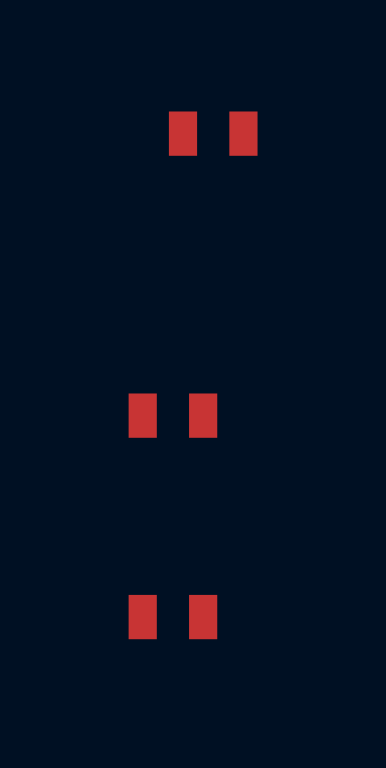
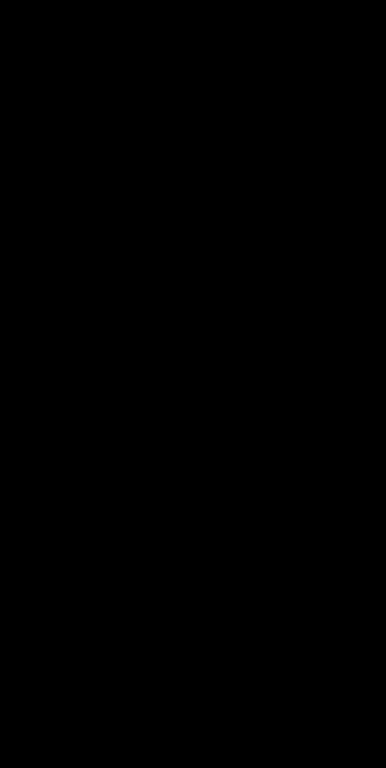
part: (213, 133) -> none
part: (172, 415) -> none
part: (172, 617) -> none

